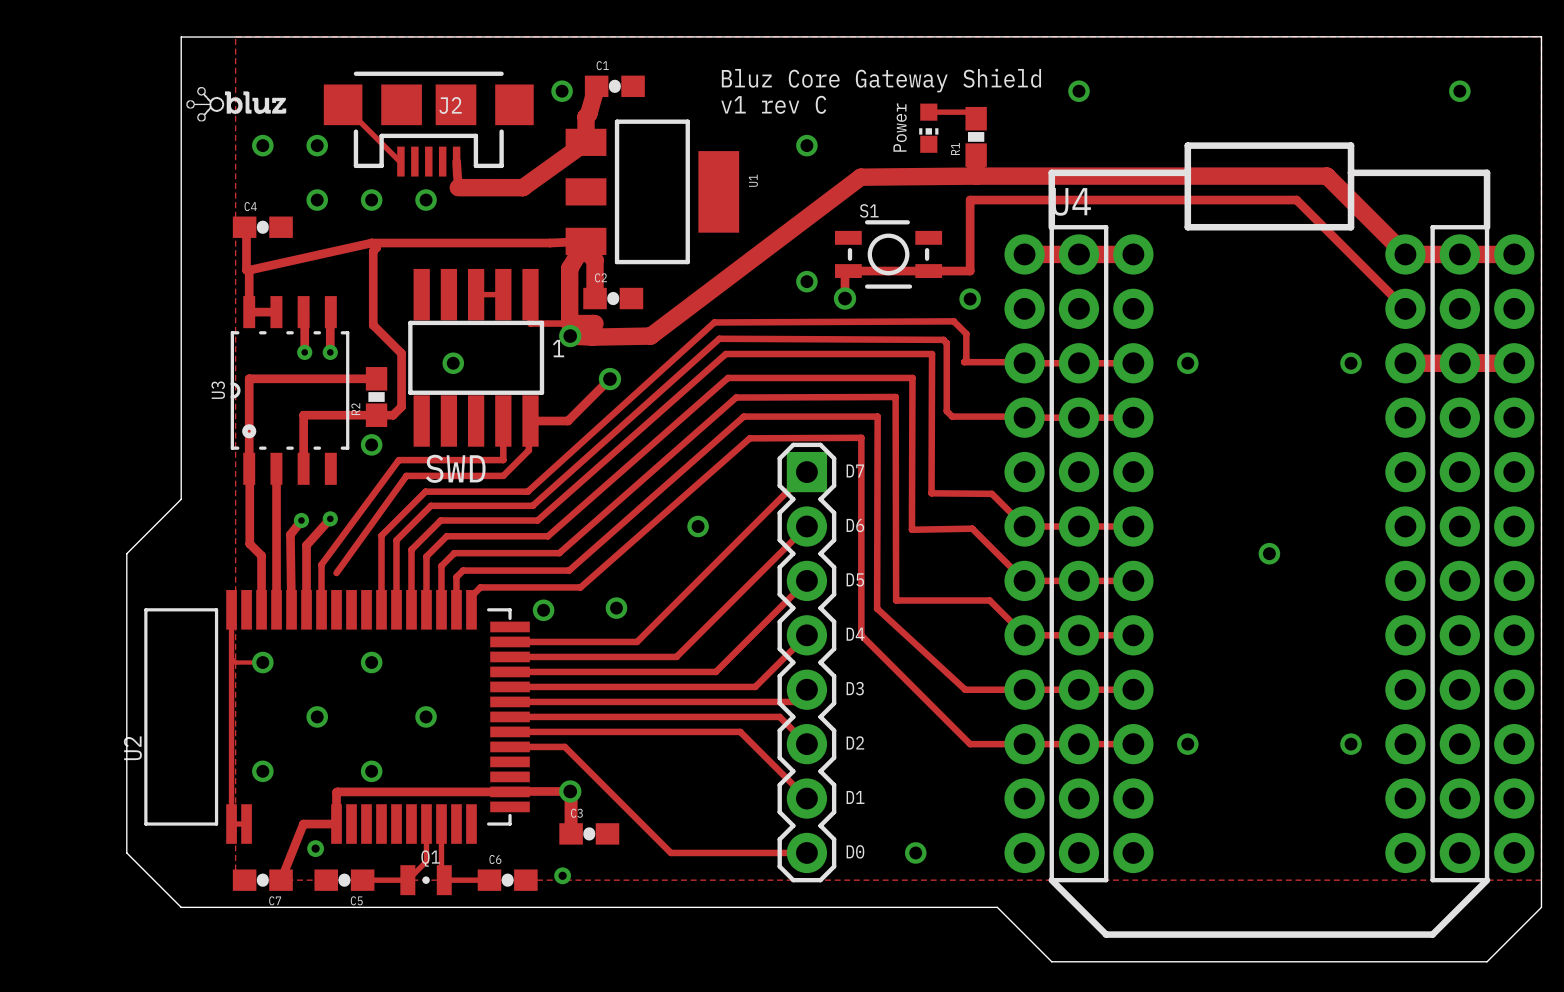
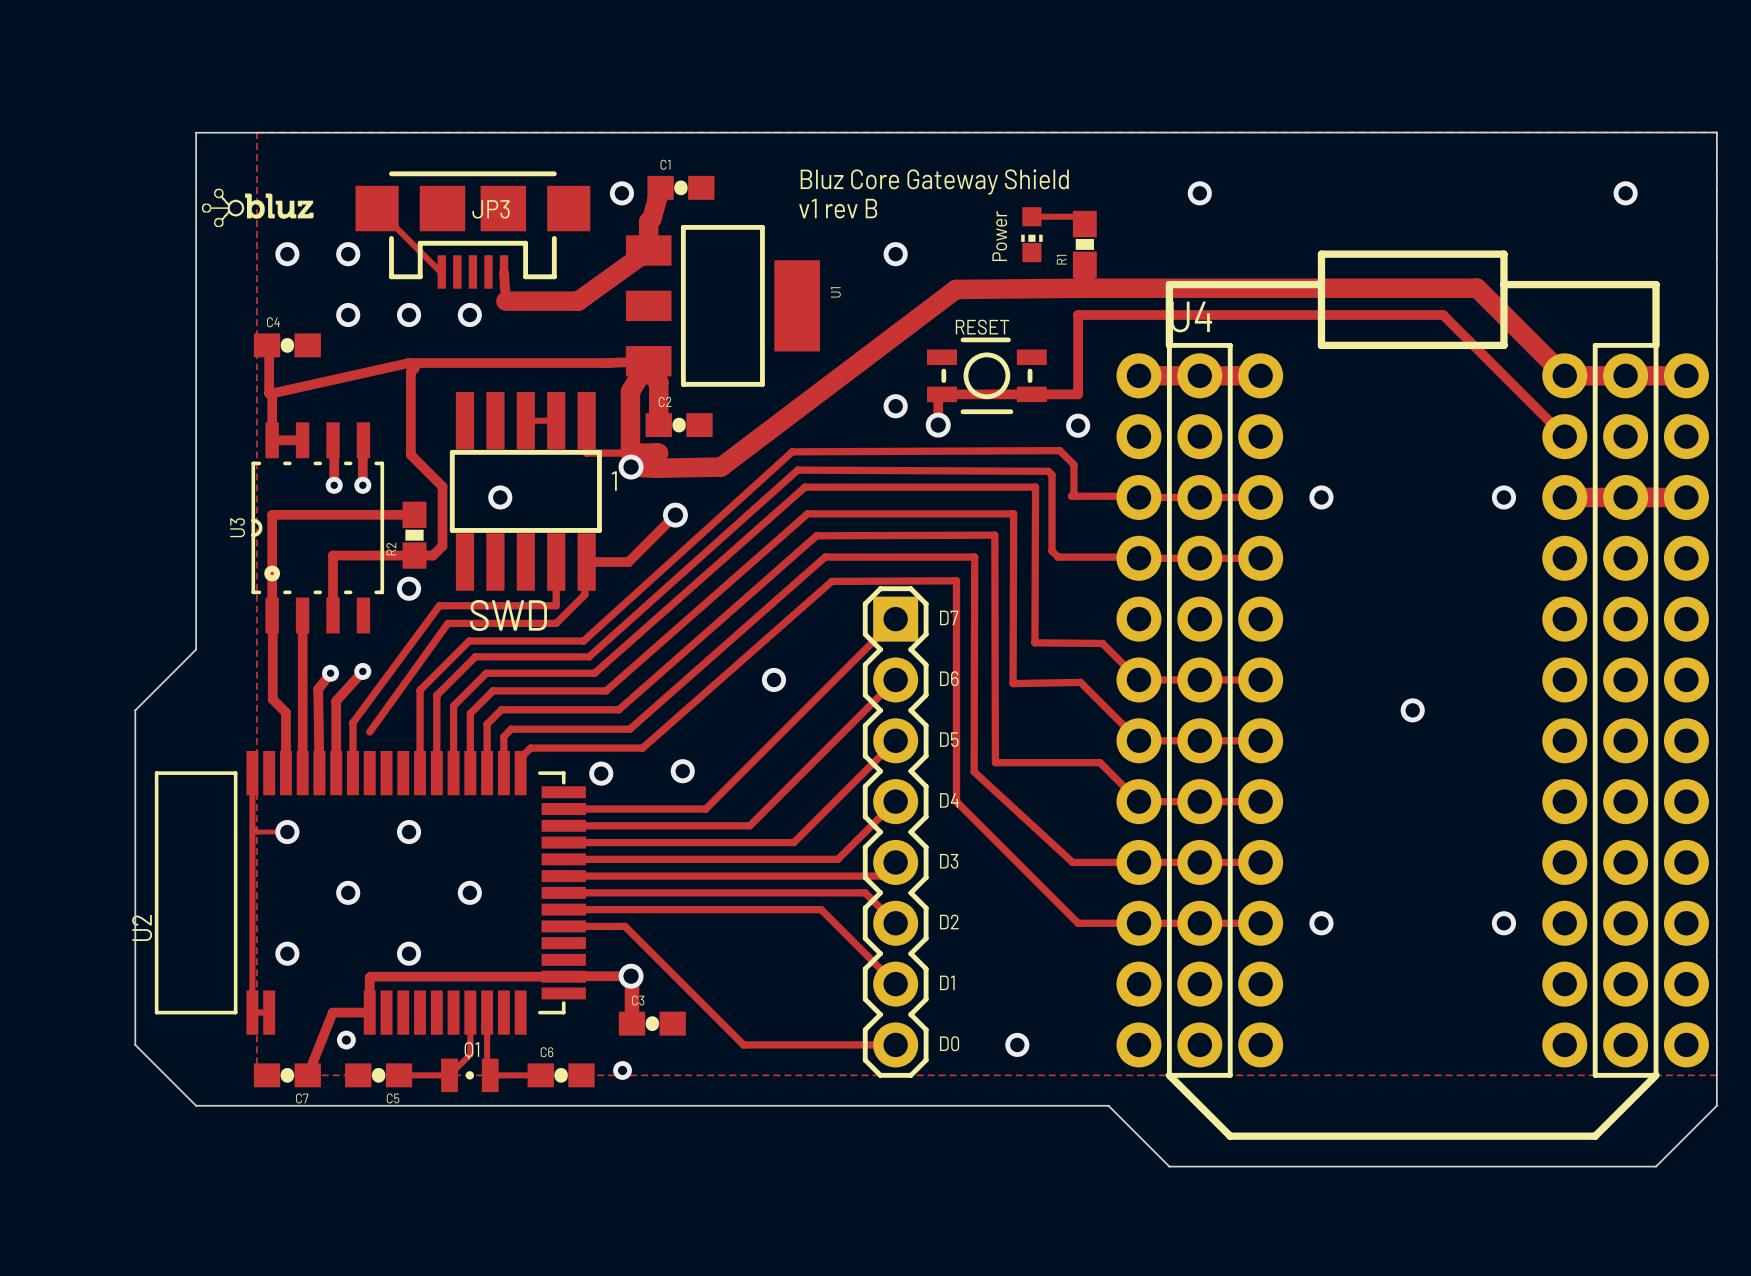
text: v1 rev C (773, 104) -> v1 rev B (838, 208)
J2 name: J2 (450, 105) -> JP3 (491, 209)
S1 name: S1 (869, 210) -> RESET (982, 327)

